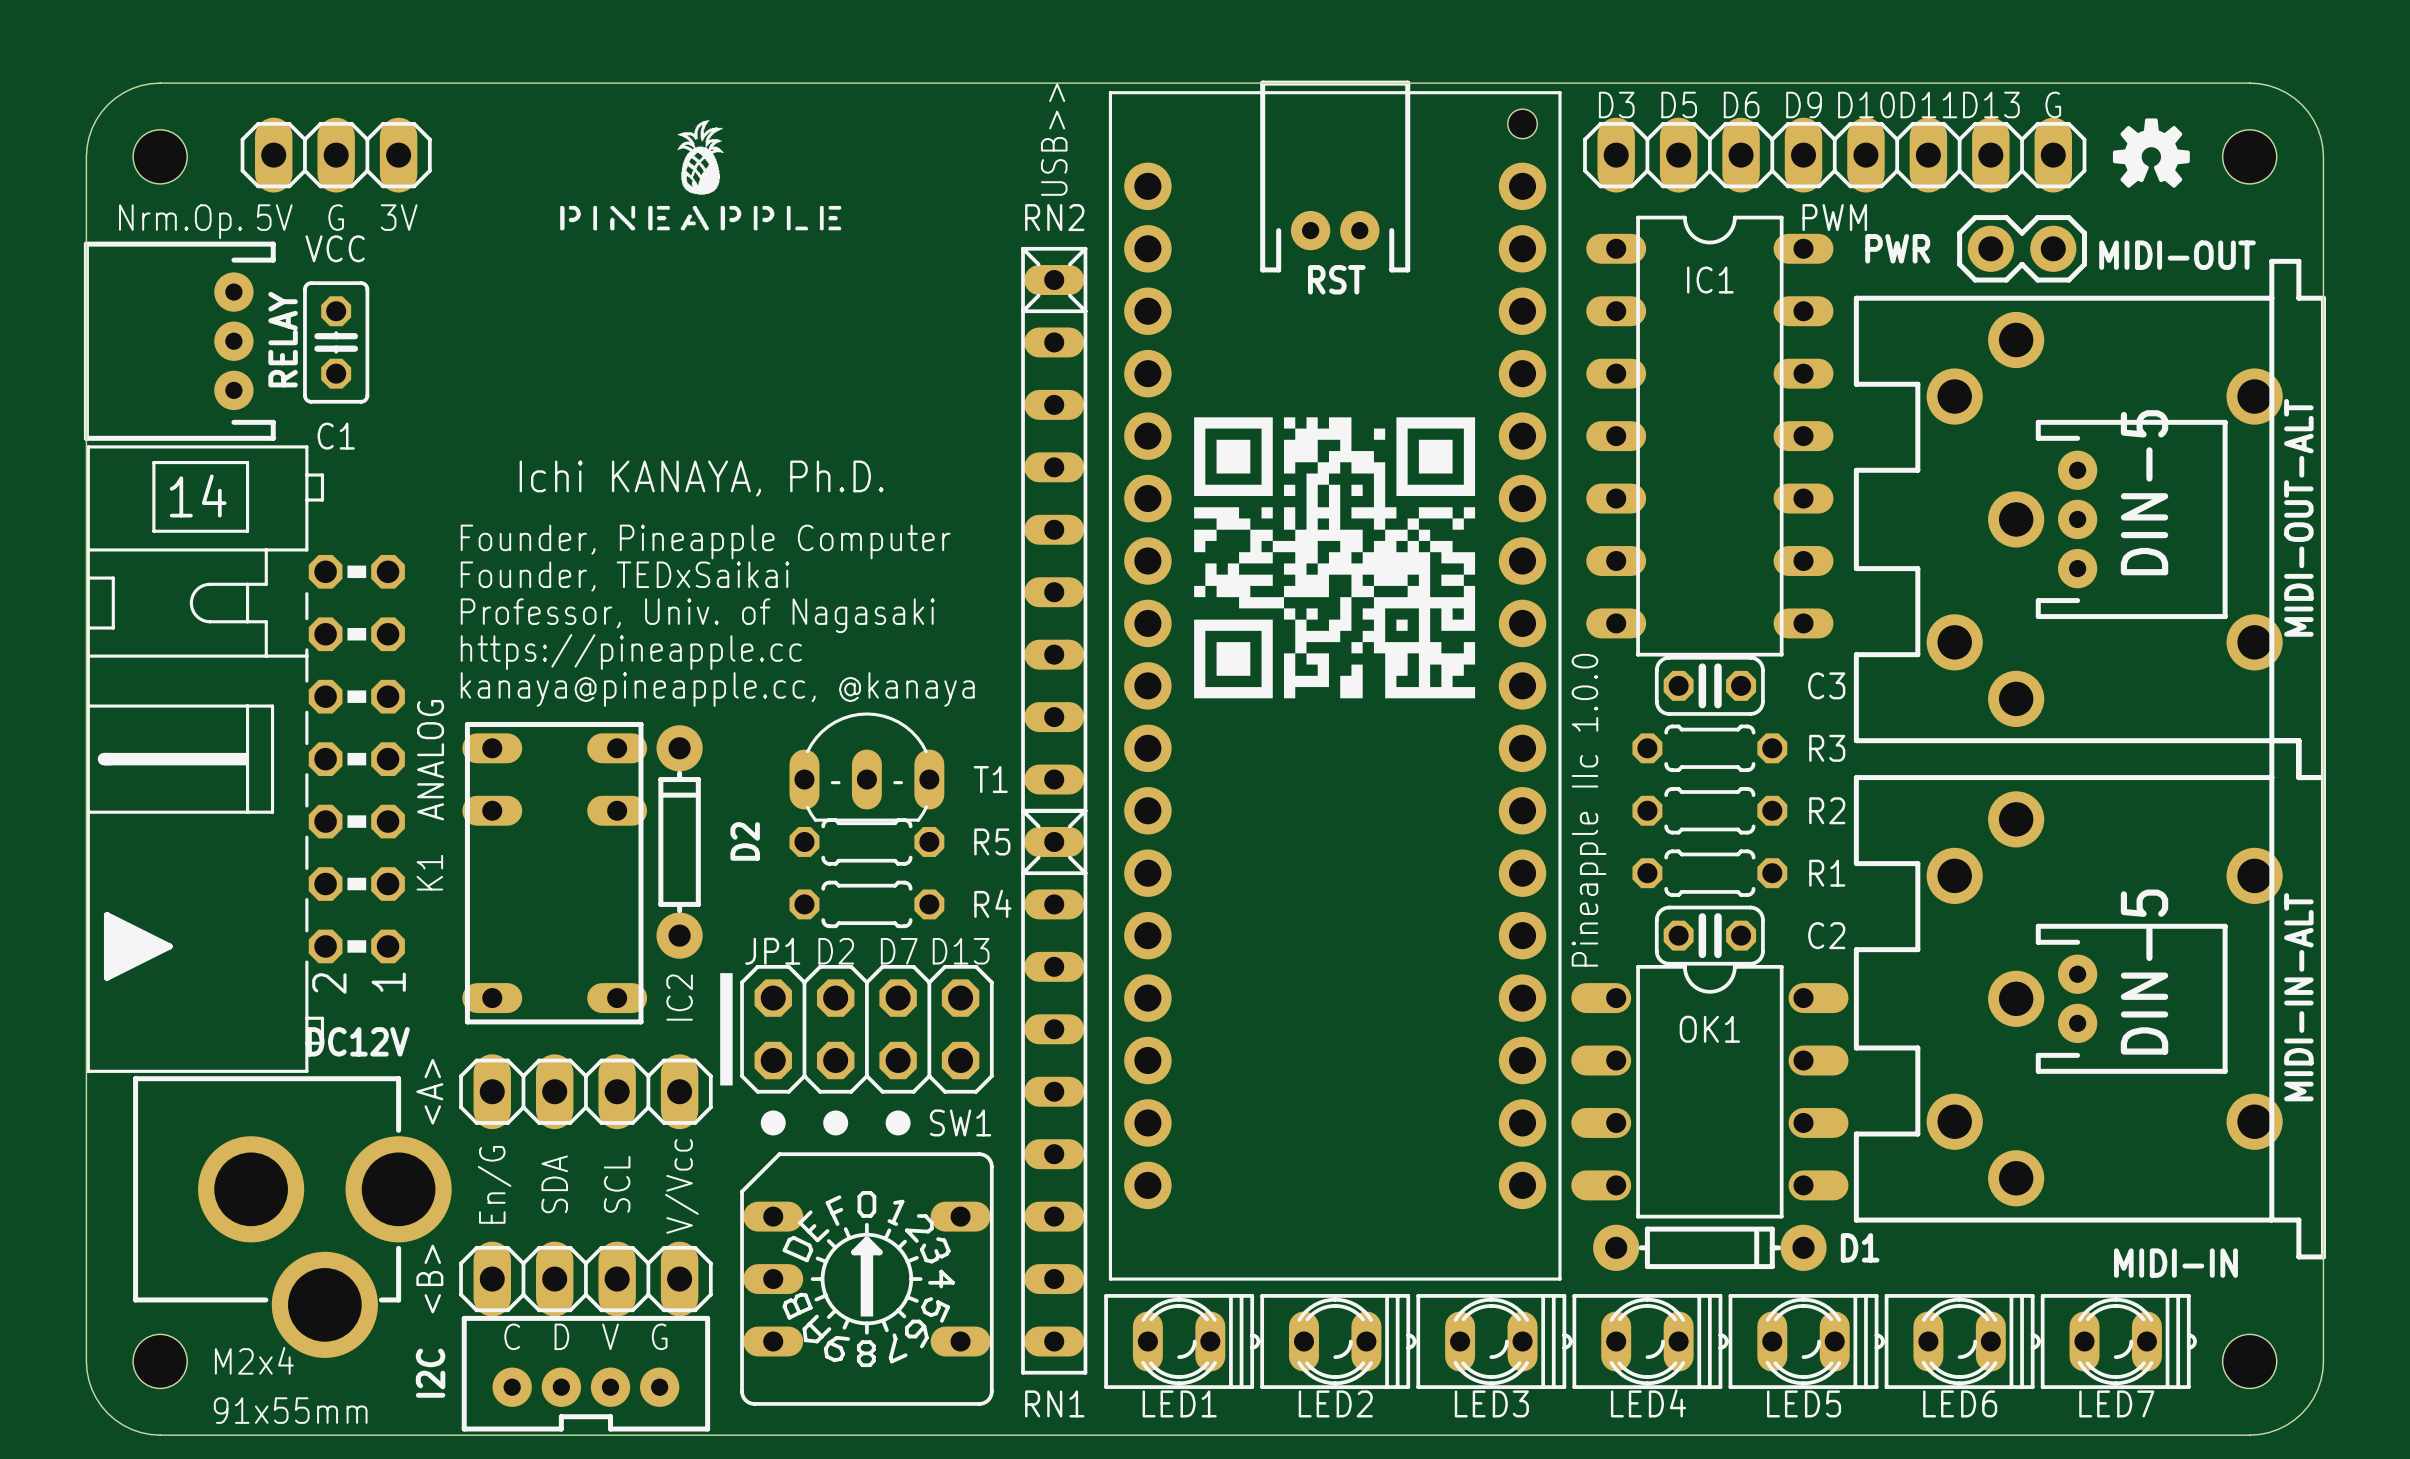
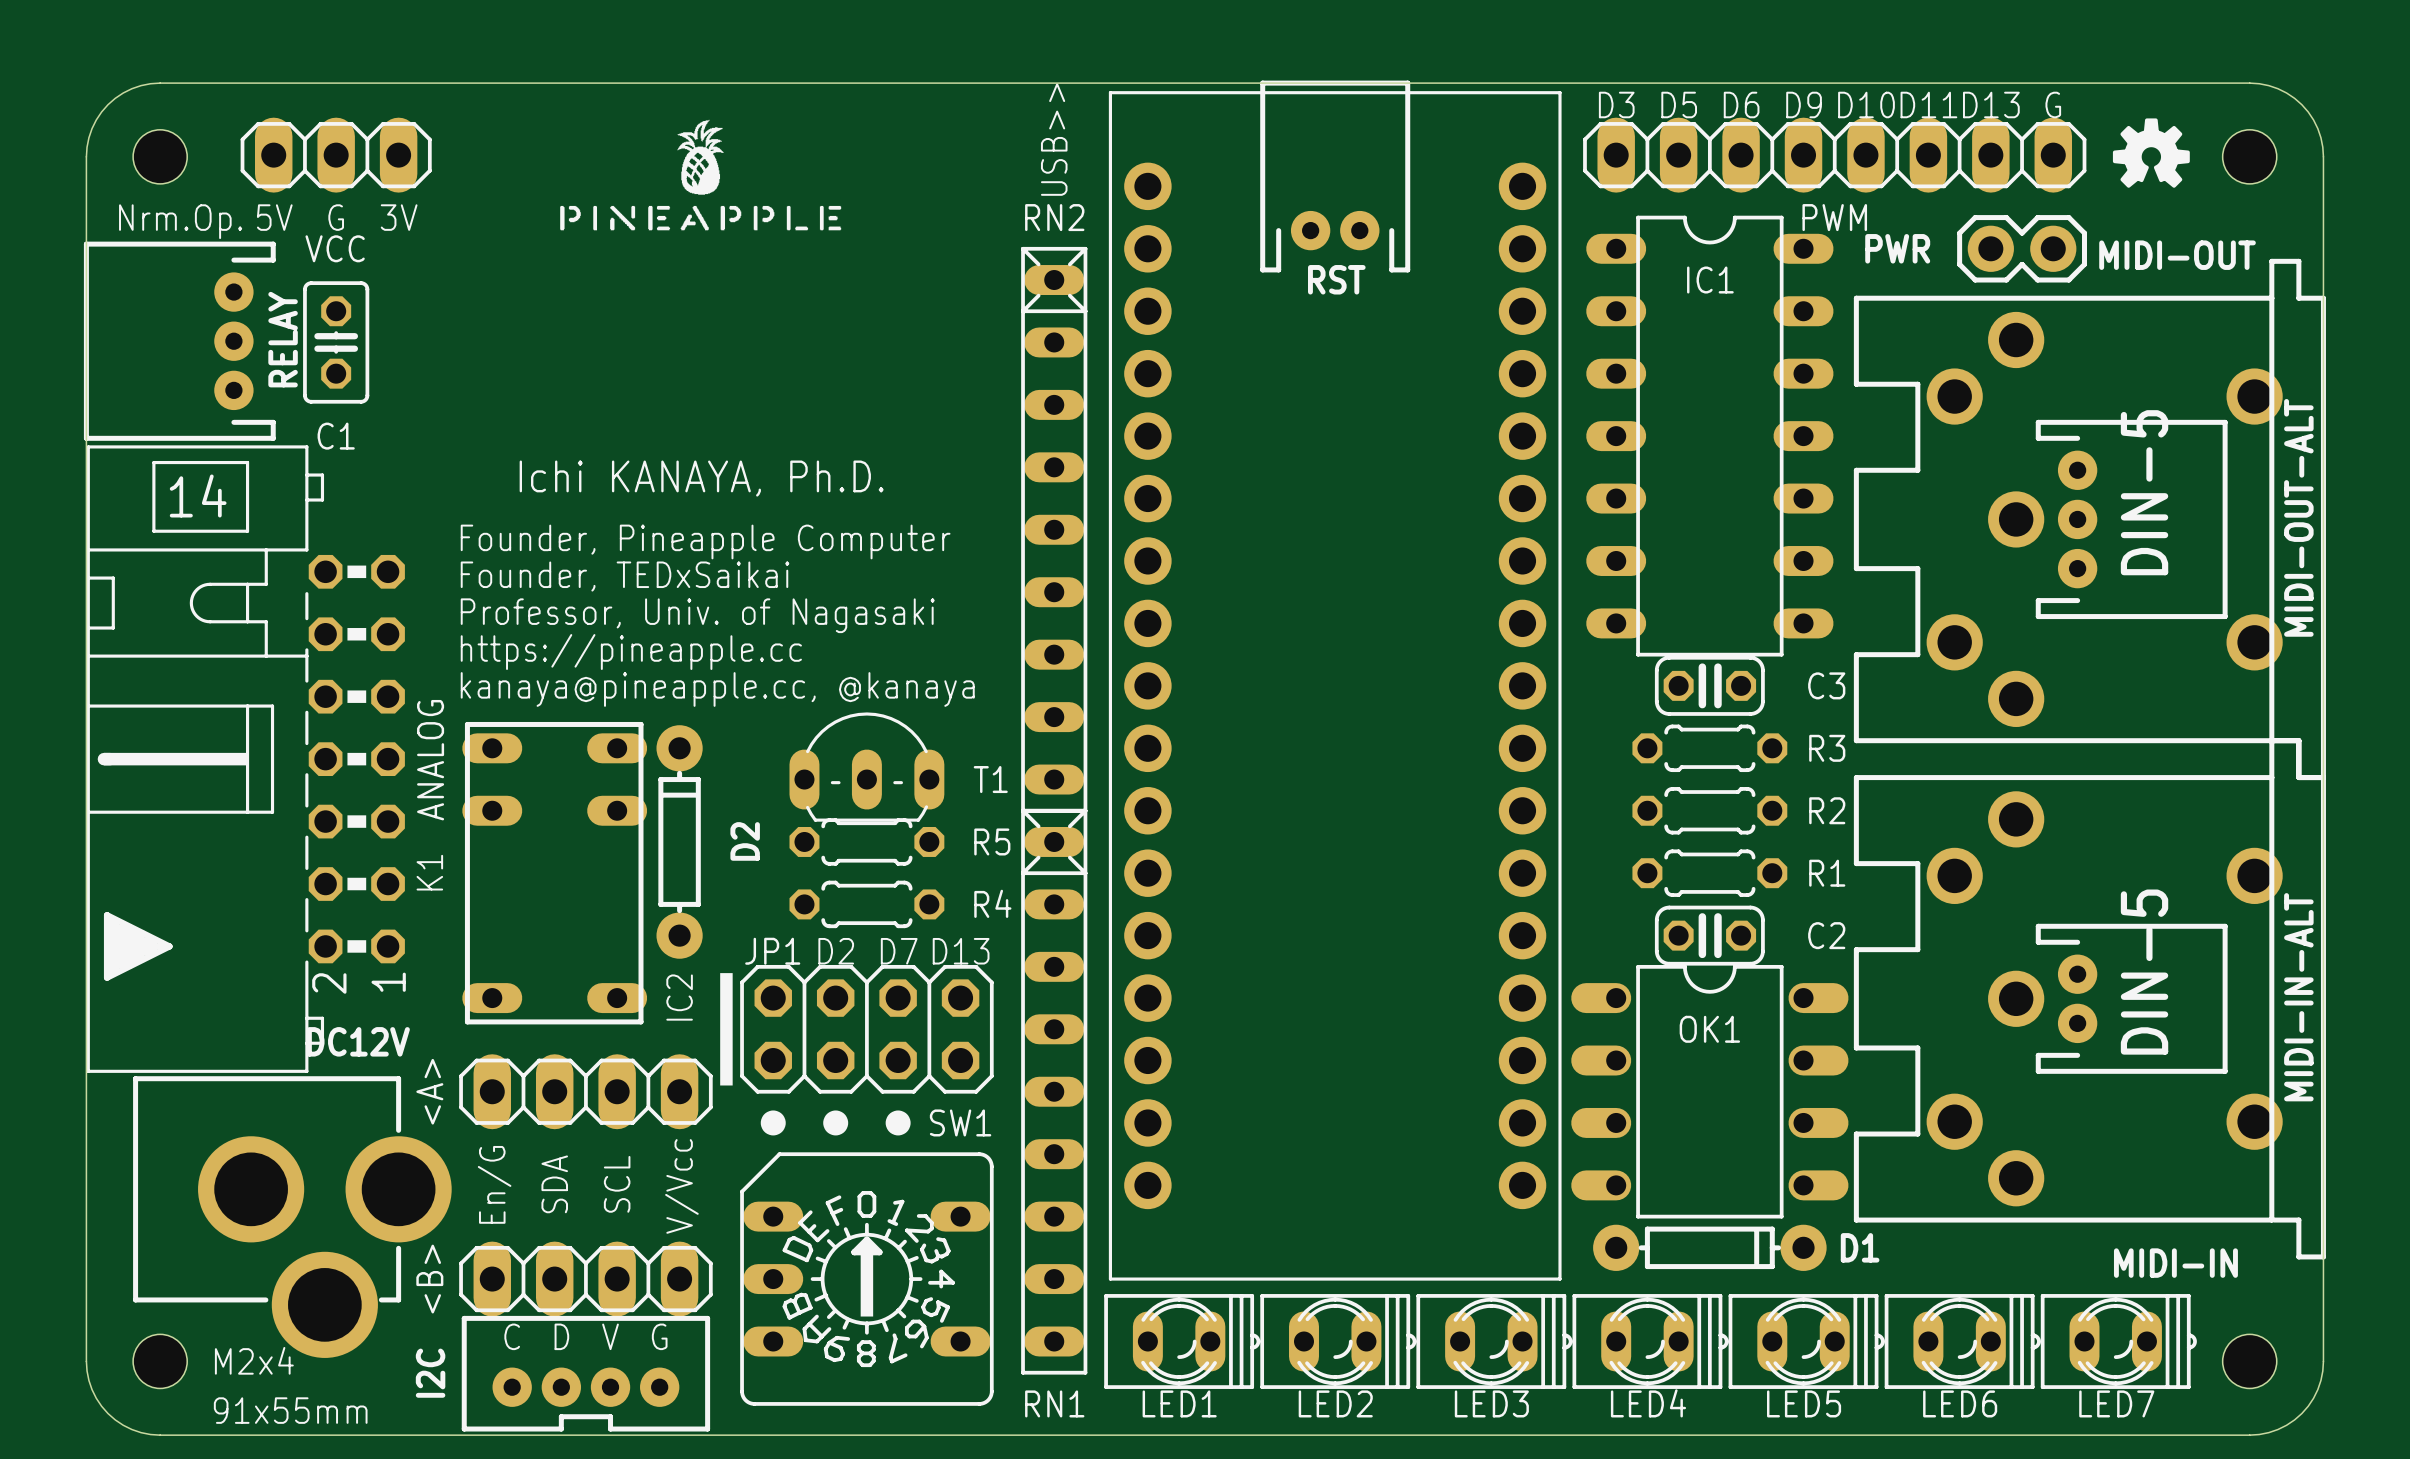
hole: (1522, 123) -> none
drawing: [1194, 417, 1476, 699] -> none
text: Pineapple IIc 1.0.0 (1589, 810) -> none

